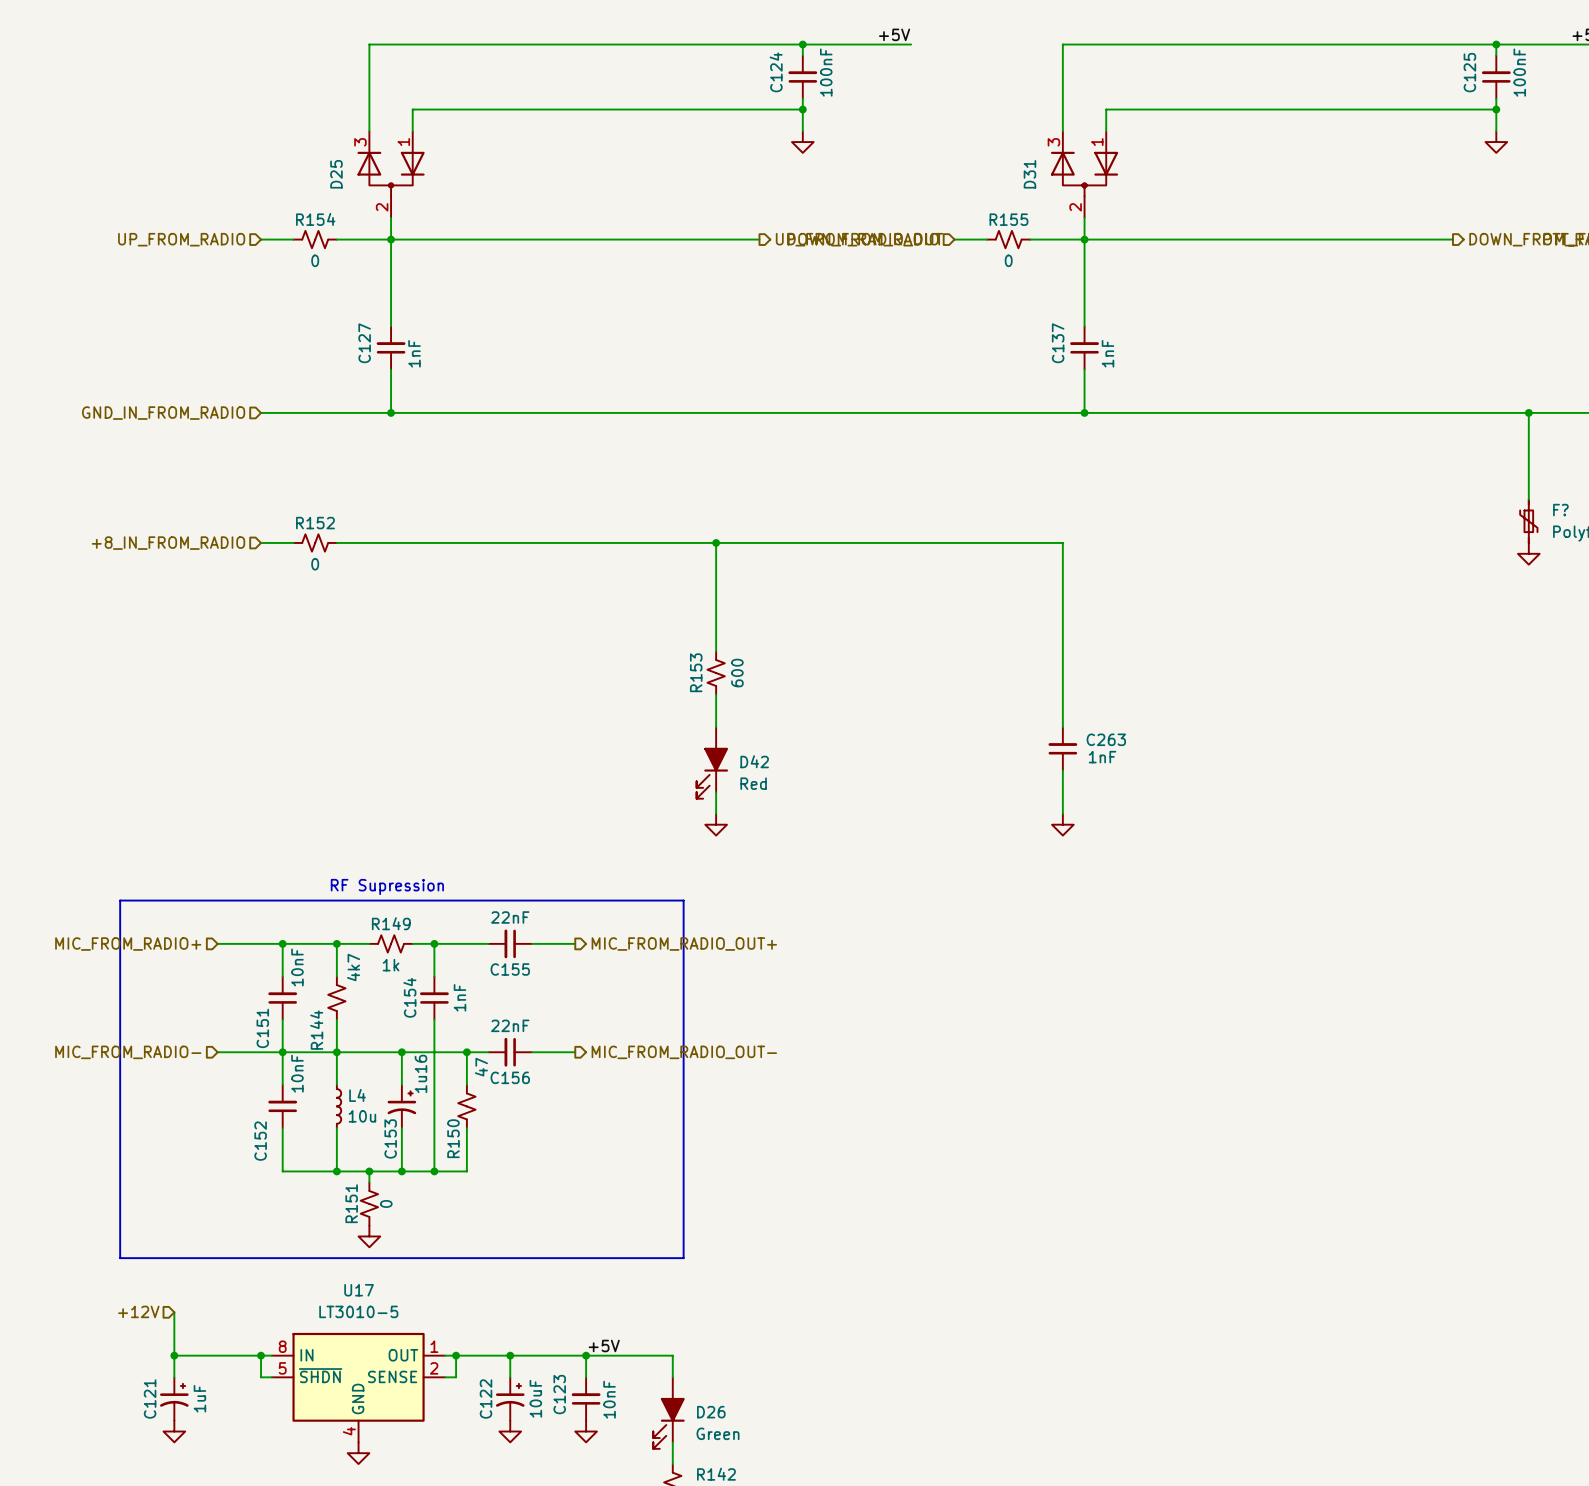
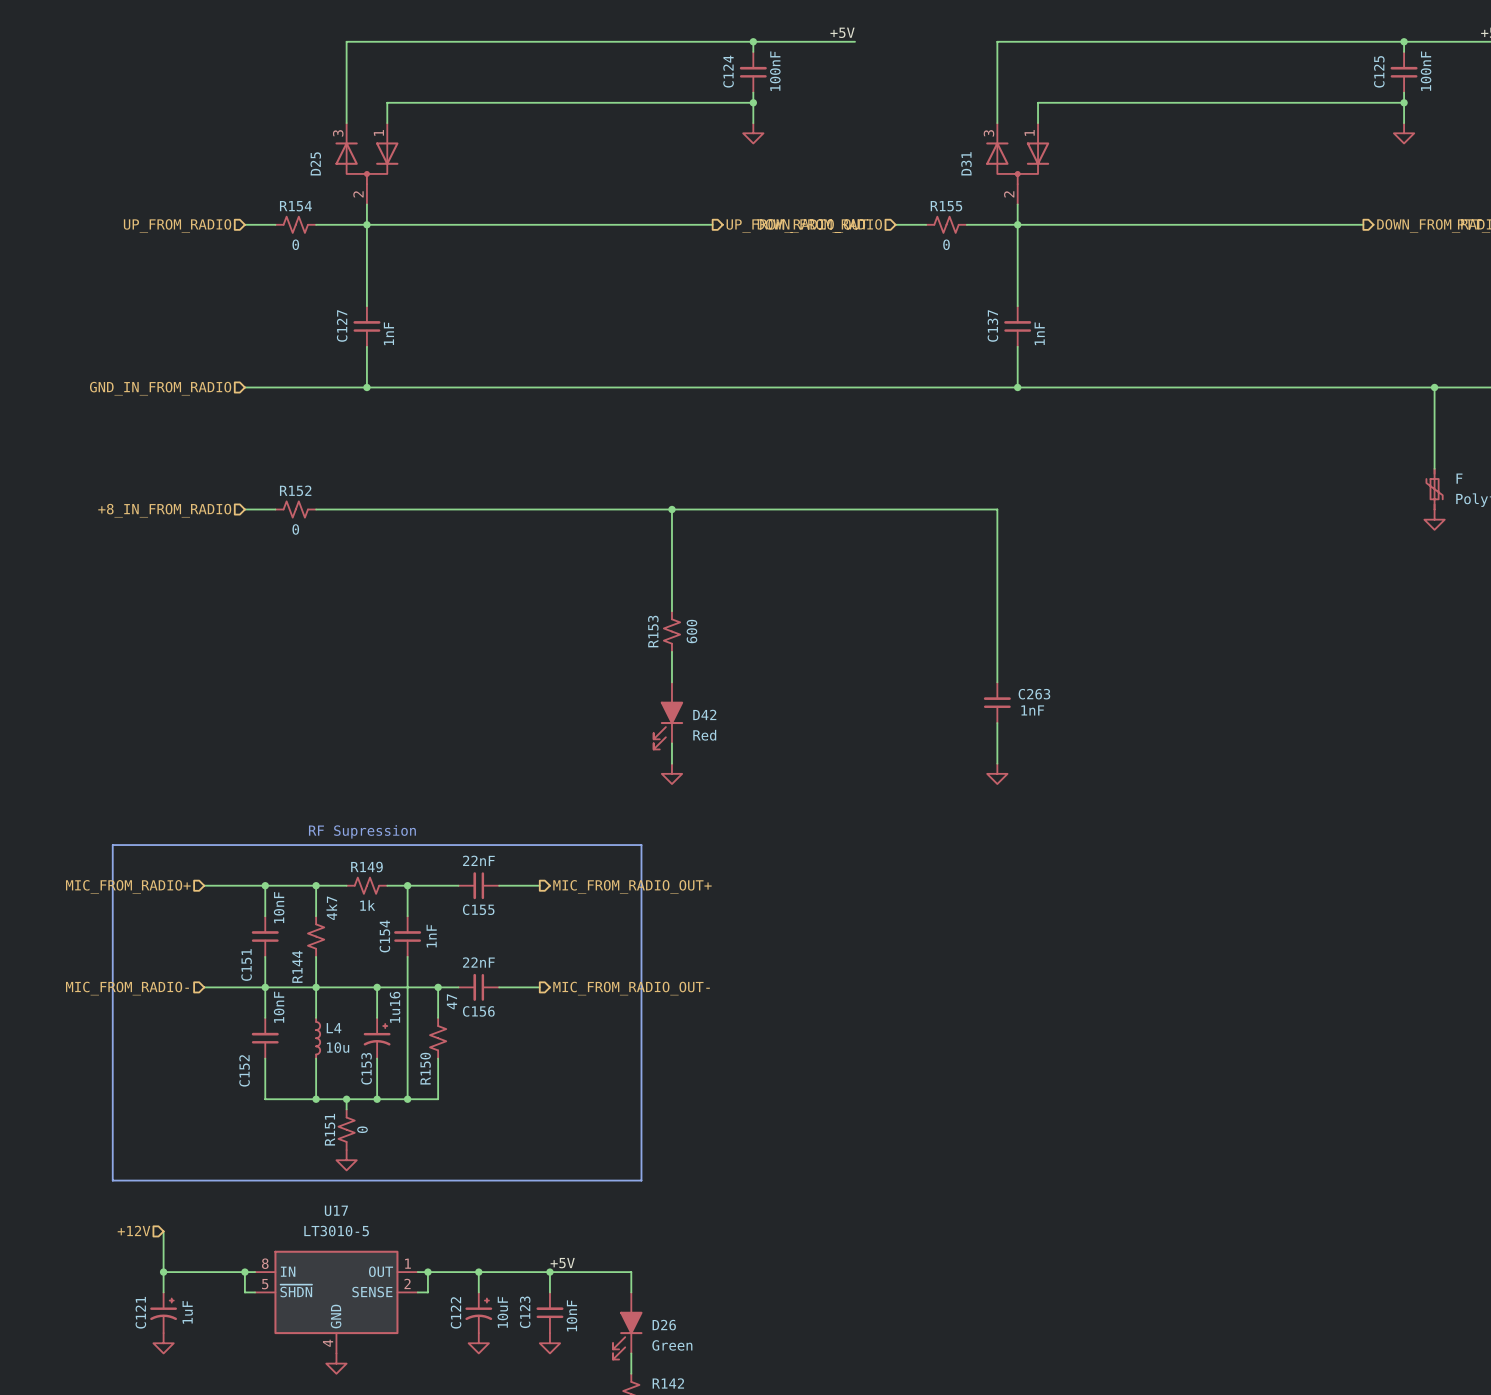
F? name: F? (1560, 510) -> F (1459, 478)

